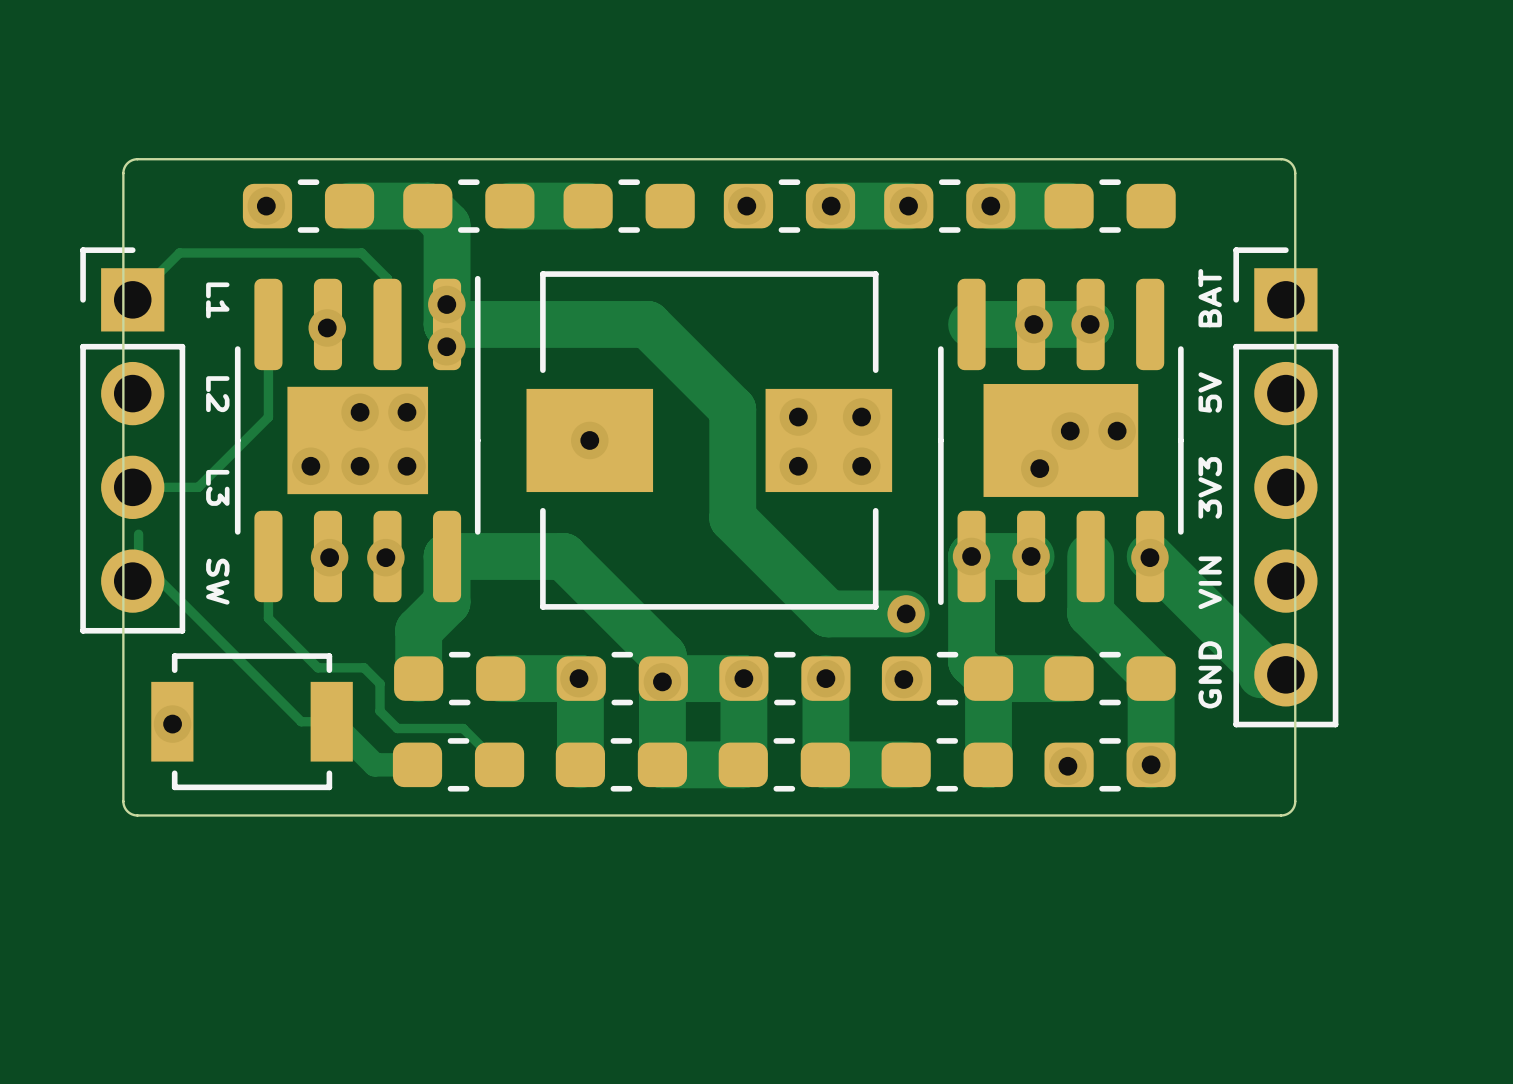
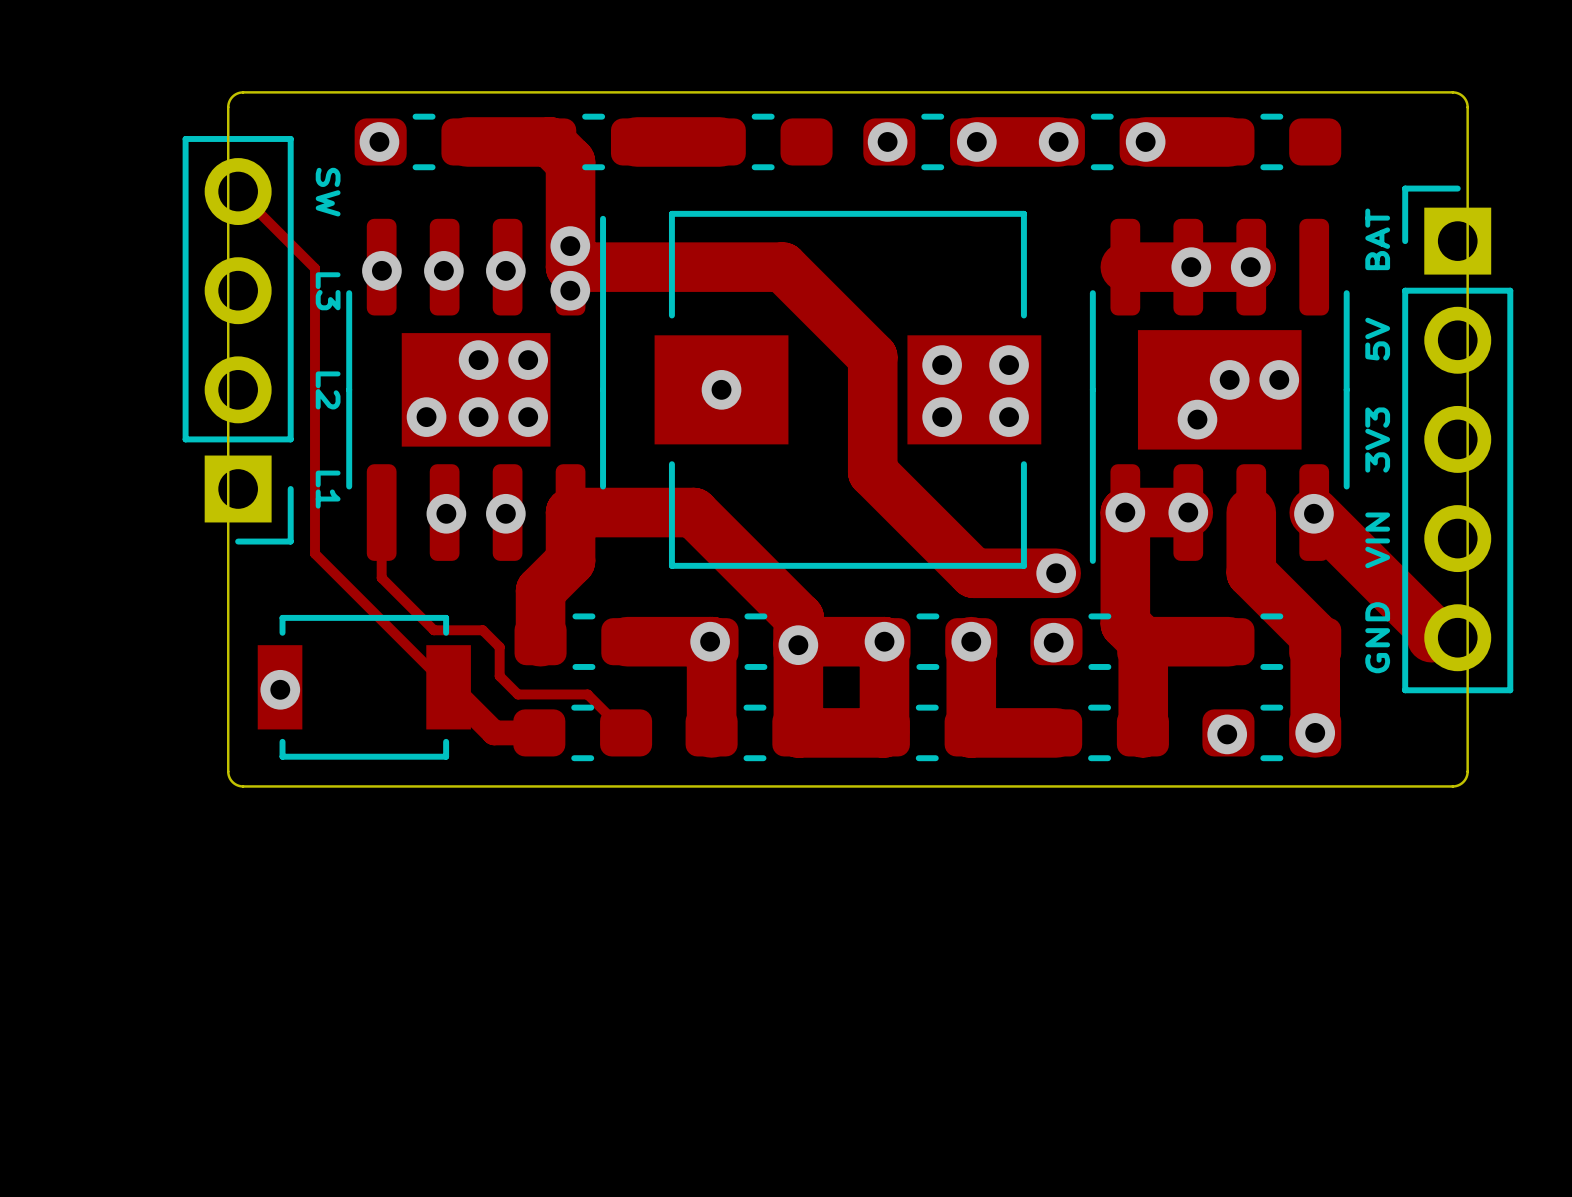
track: (138, 299) (138, 293) (179, 252) (361, 252) (387, 278) (387, 324) -> none
text position: L1 (217, 300) -> L1 (328, 489)
track: (268, 324) (268, 417) (198, 487) (138, 487) -> none
via: none -> (381, 270)
via: none -> (505, 270)
text position: L2 (217, 394) -> L2 (328, 390)
part rotation: 0° (132, 440) -> 180° (238, 340)
text position: L3 (217, 487) -> L3 (328, 291)
track: (138, 534) (138, 559) (301, 721) (331, 721) -> (244, 191) (244, 197) (314, 268) (314, 553) (448, 687)
text position: SW (217, 581) -> SW (328, 192)

